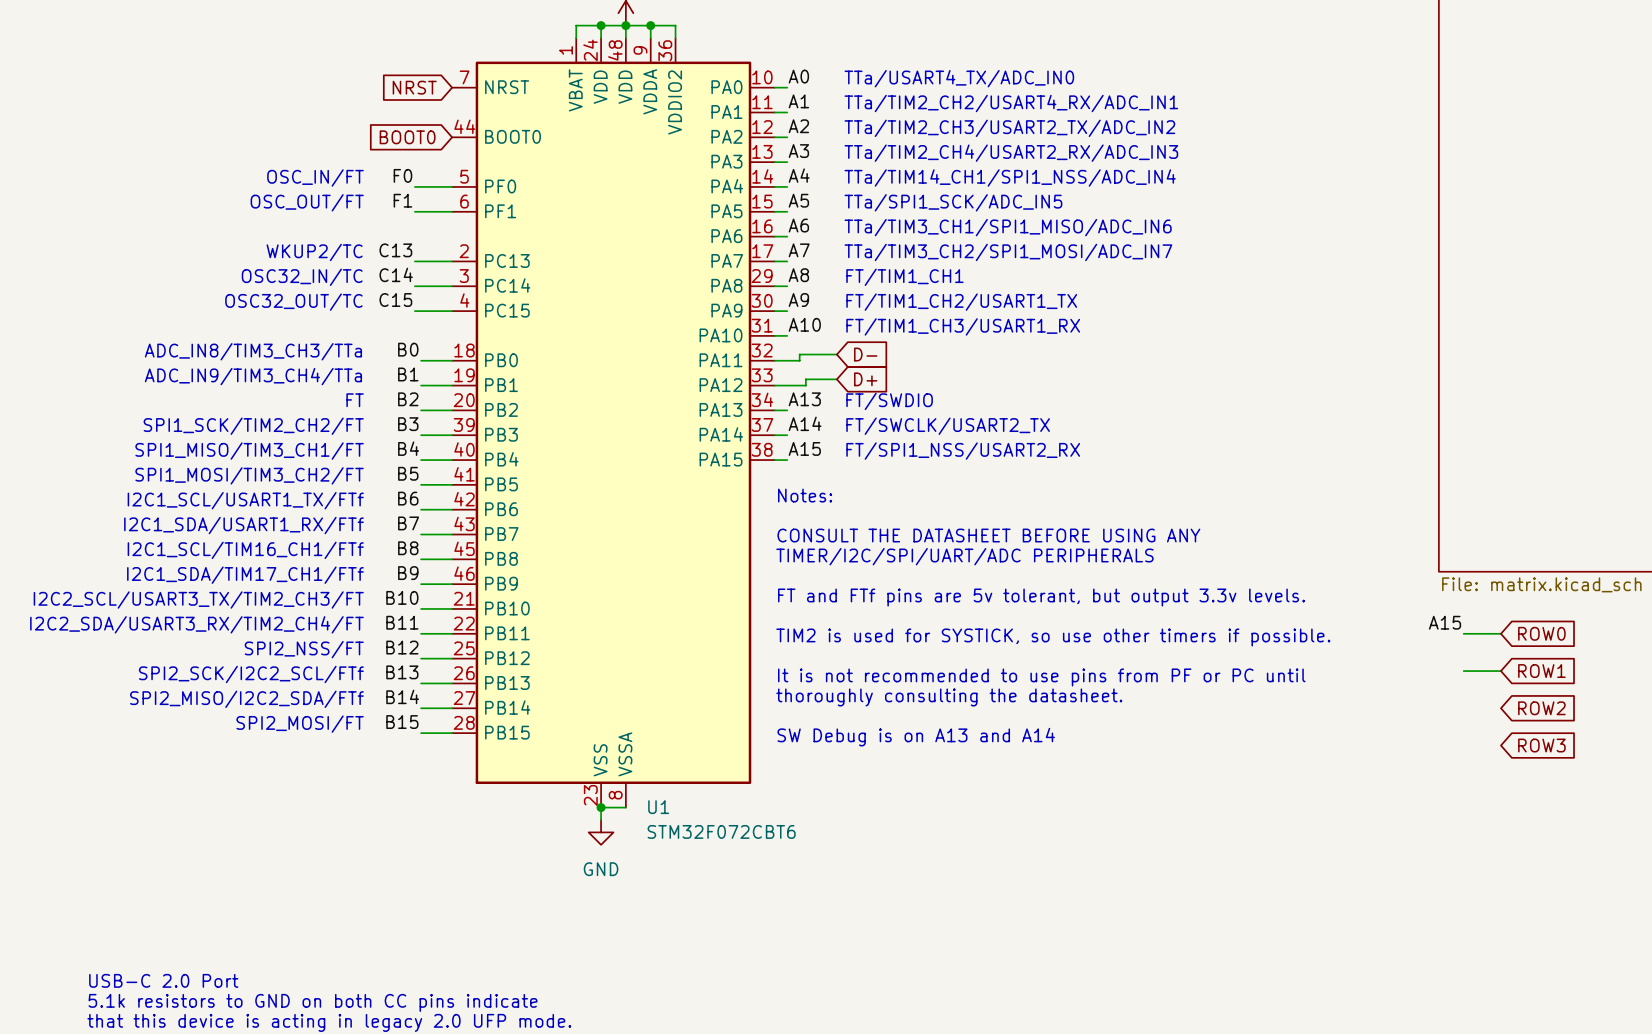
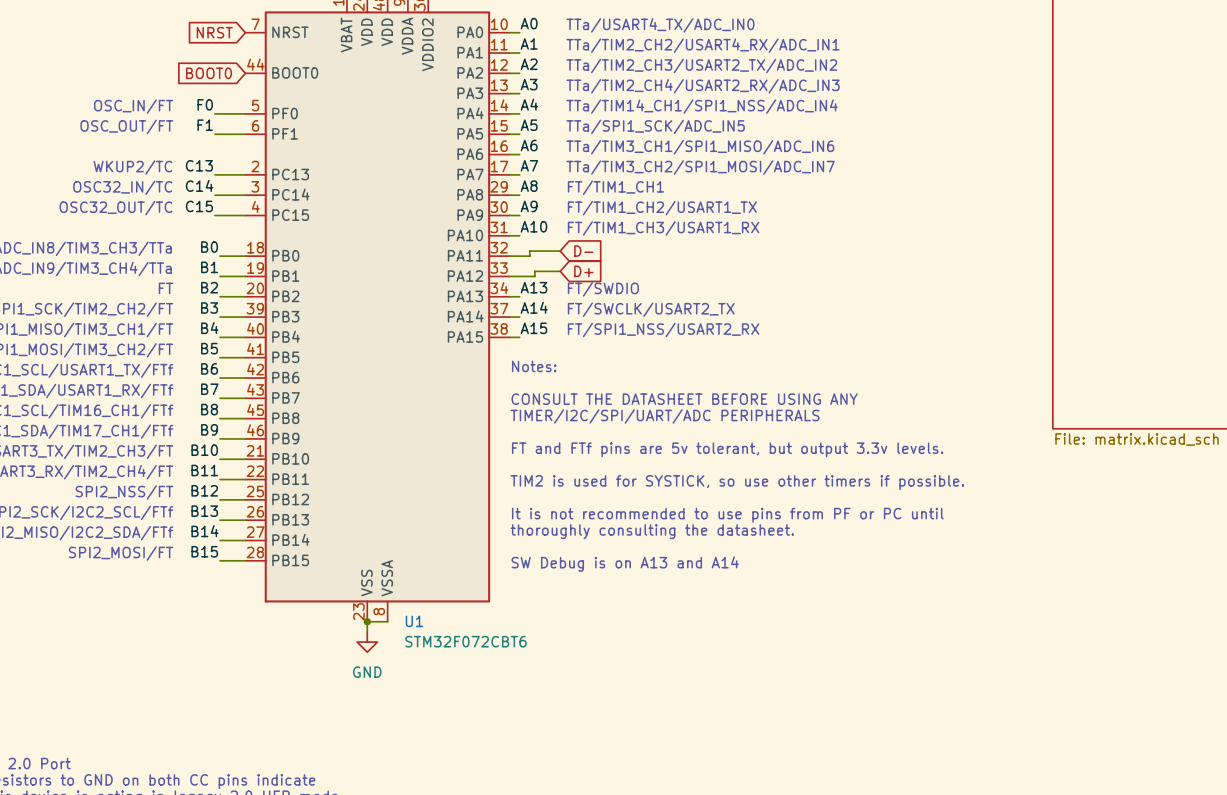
label: A15 (1445, 622) -> none
wire: (1463, 633) (1500, 633) -> none
global label: ROW0 (1541, 633) -> none
wire: (1463, 671) (1500, 671) -> none
global label: ROW1 (1541, 671) -> none
global label: ROW2 (1541, 708) -> none
global label: ROW3 (1541, 745) -> none

